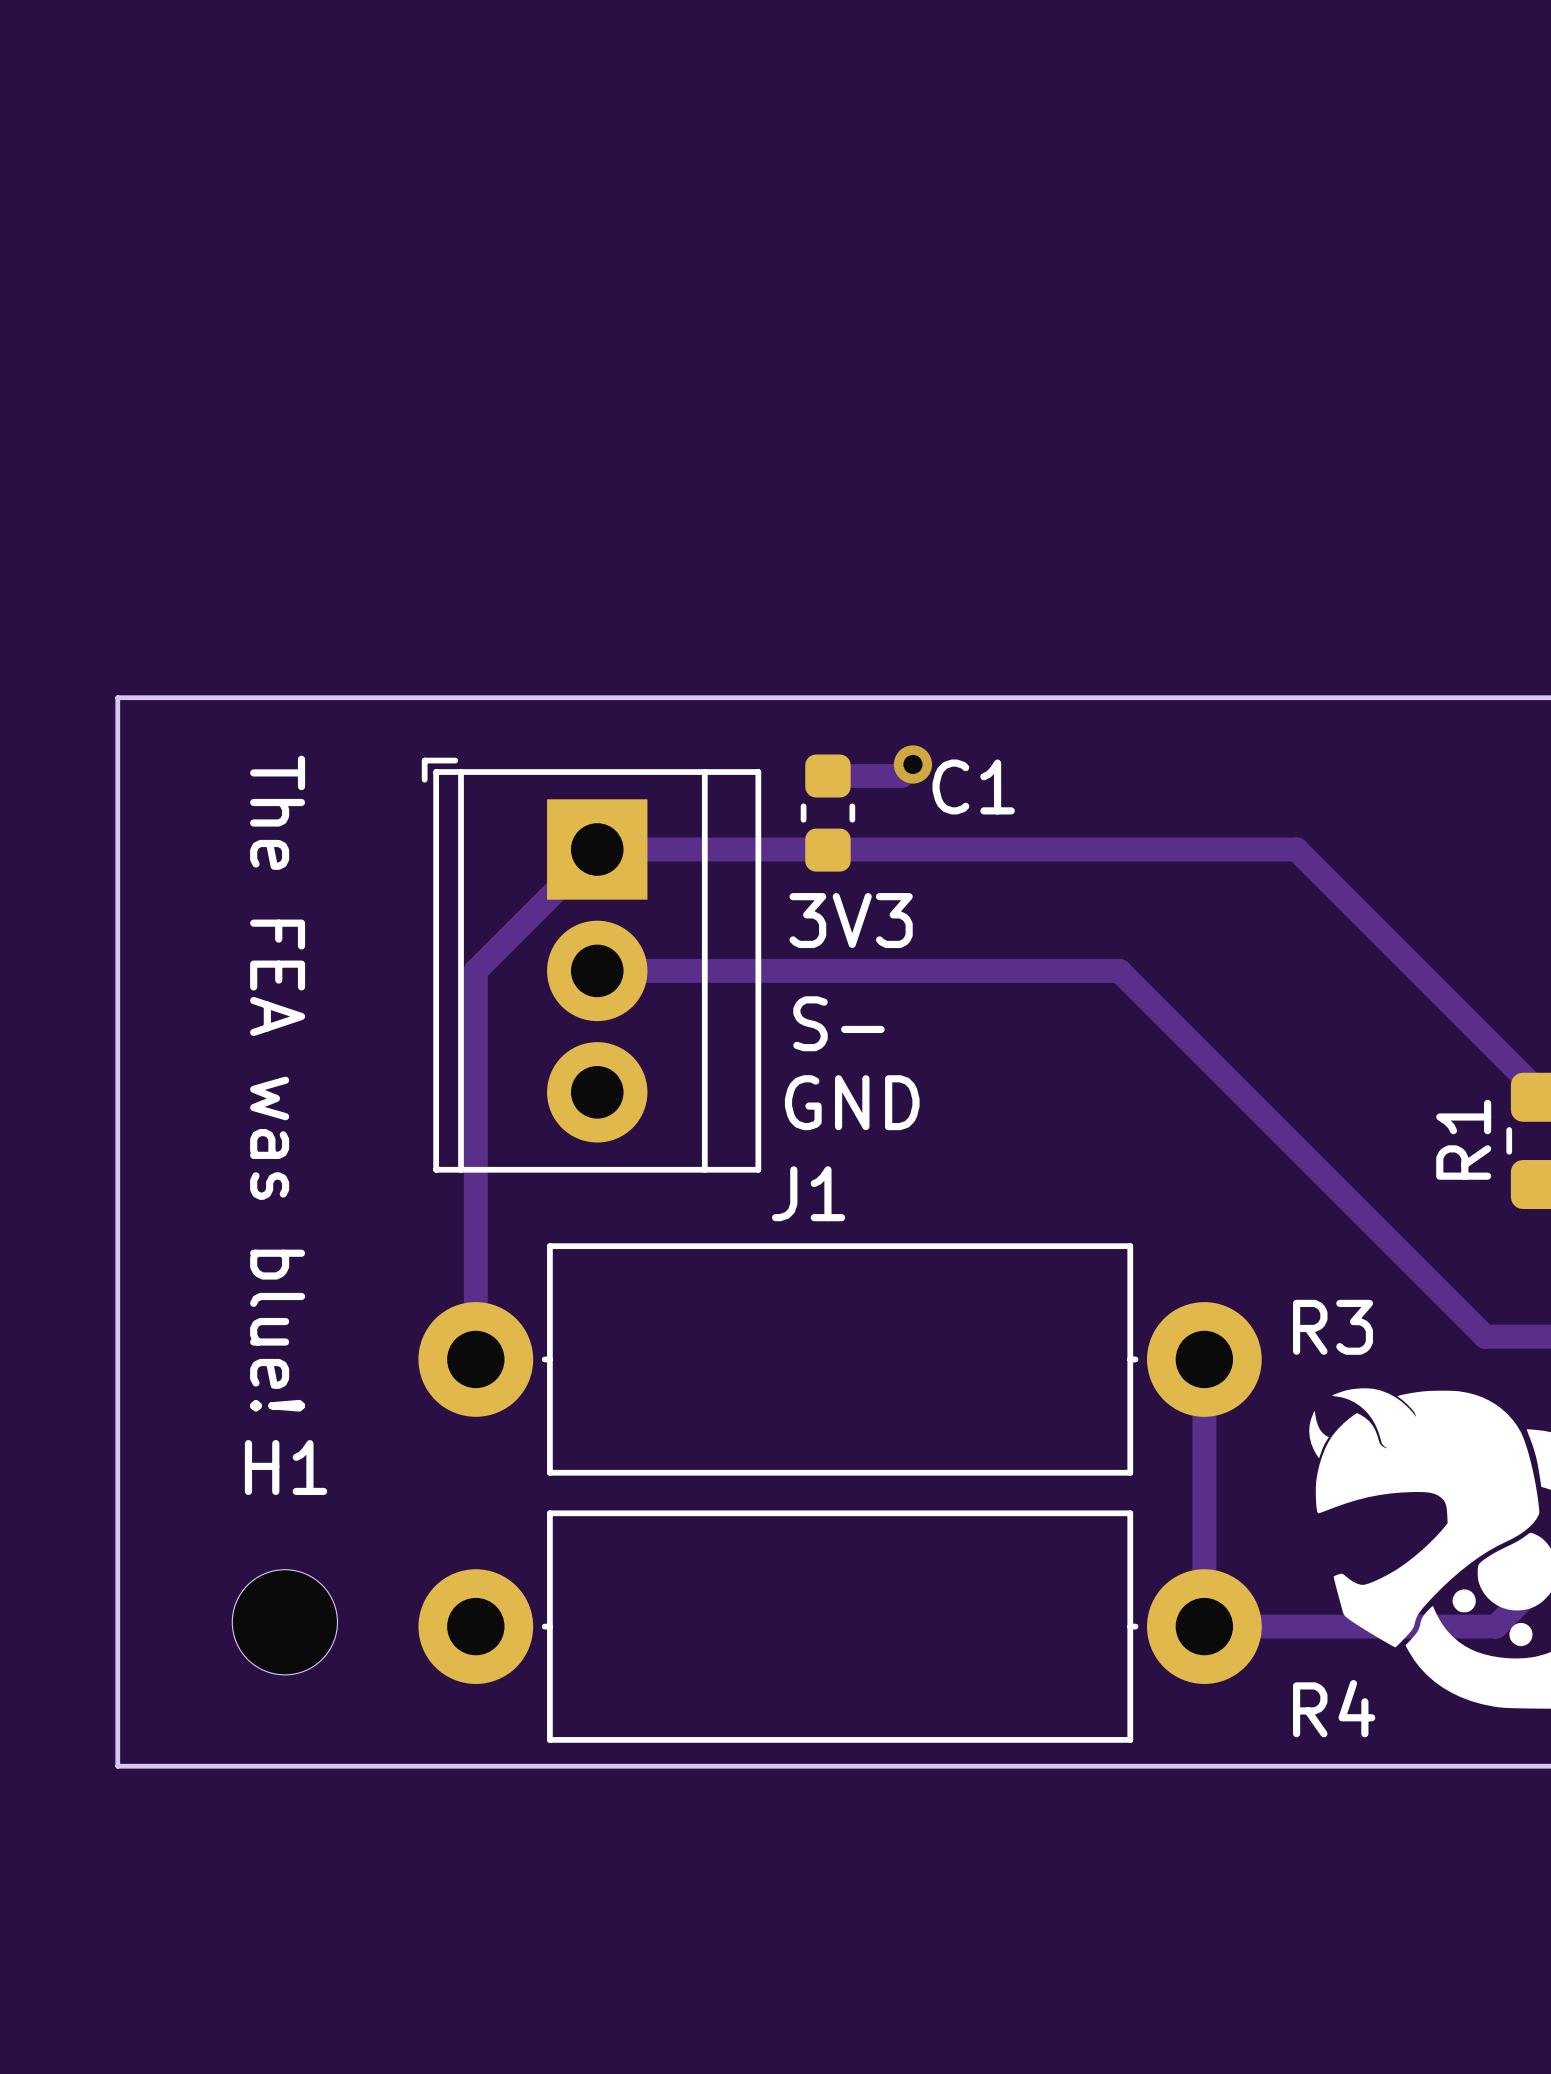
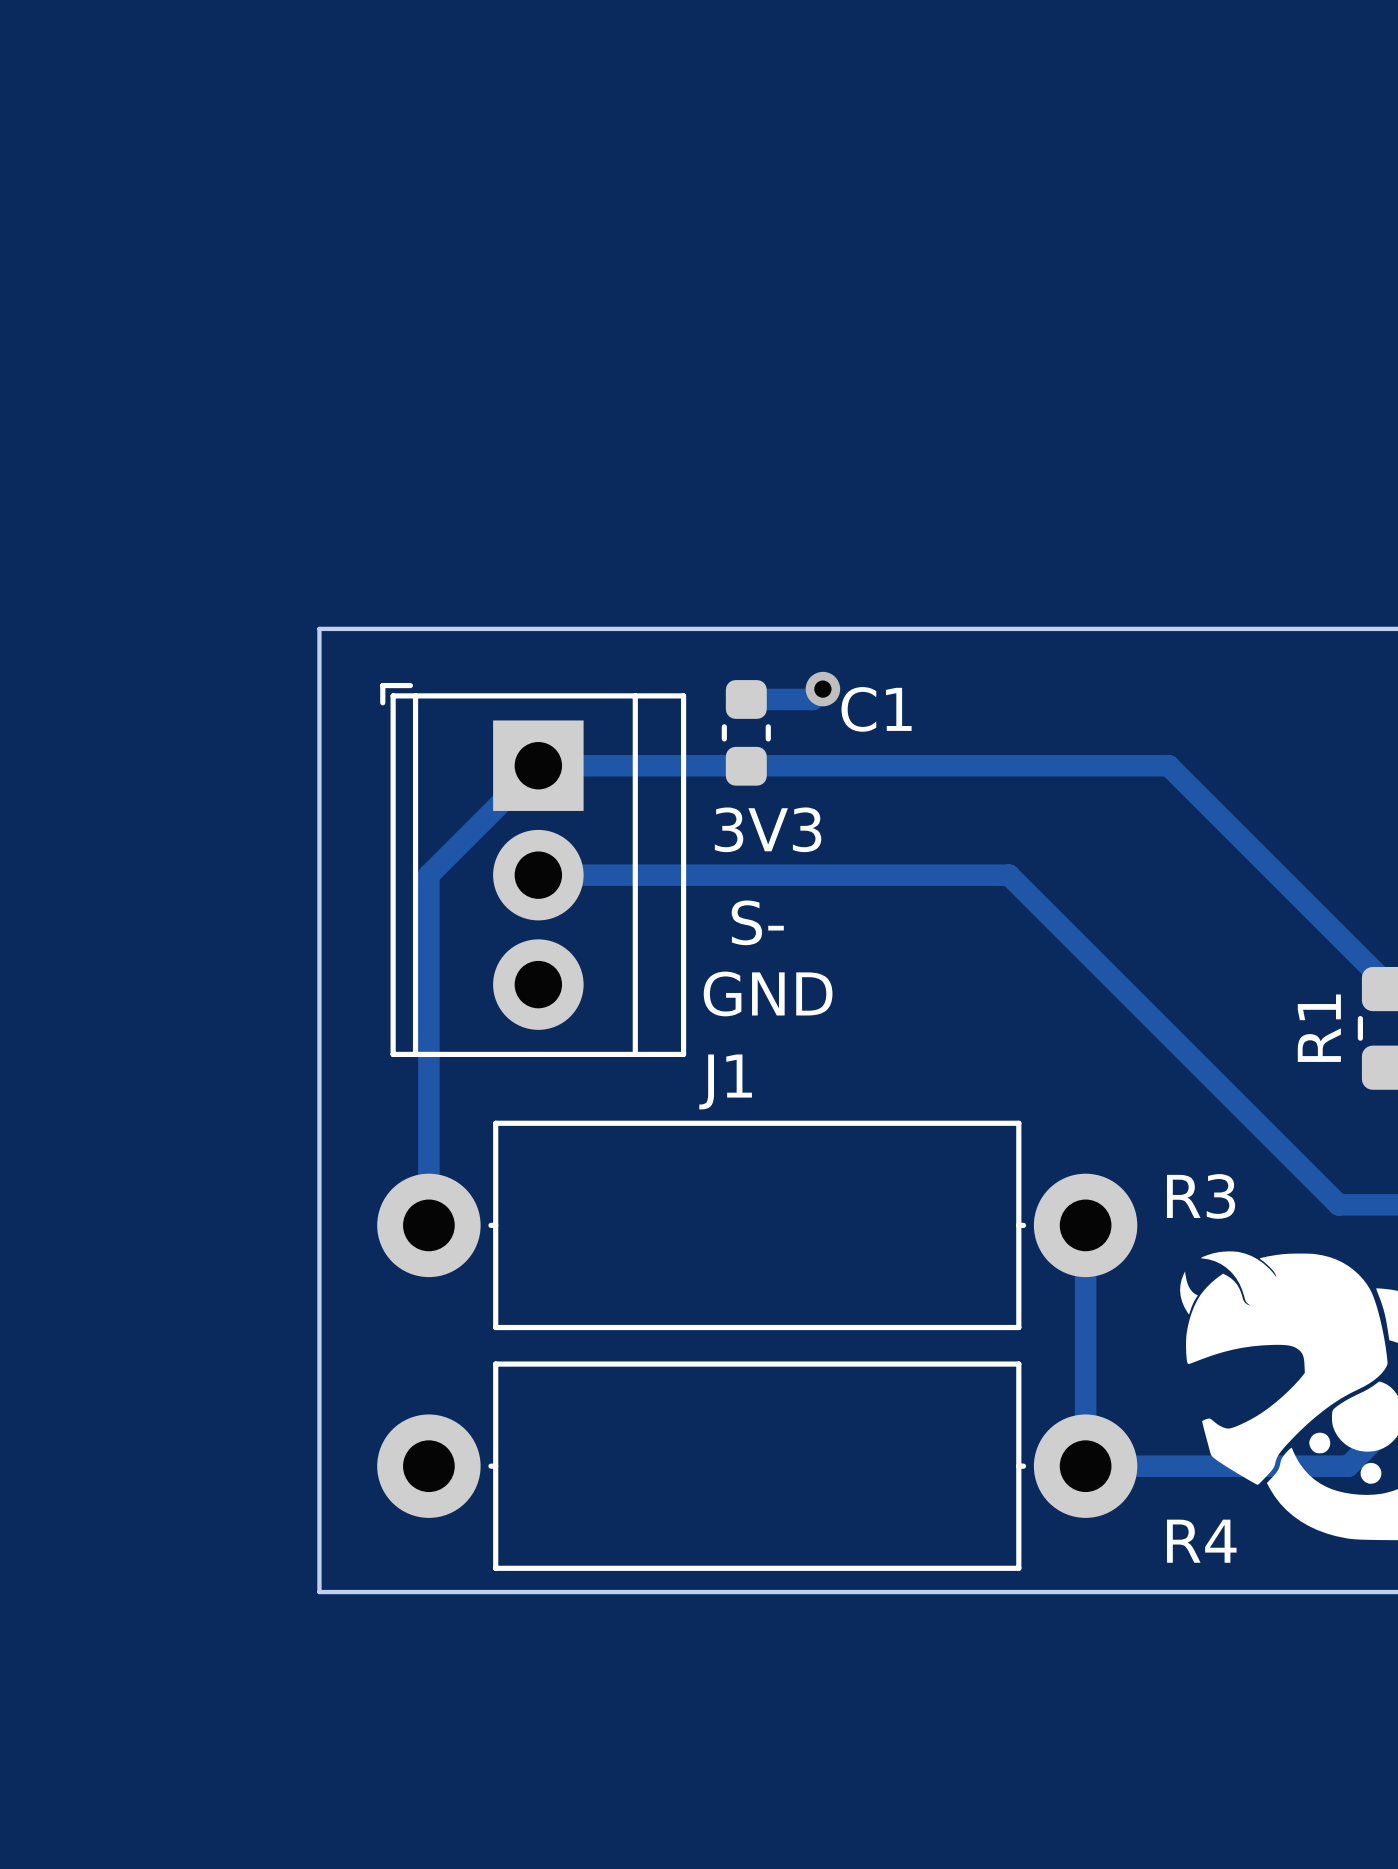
board edge: (354, 697) (117, 697) (117, 1766) (354, 1766) -> (319, 628) (319, 1592)
text: The FEA was blue! (277, 1083) -> none
H1: (284, 1622) -> none

